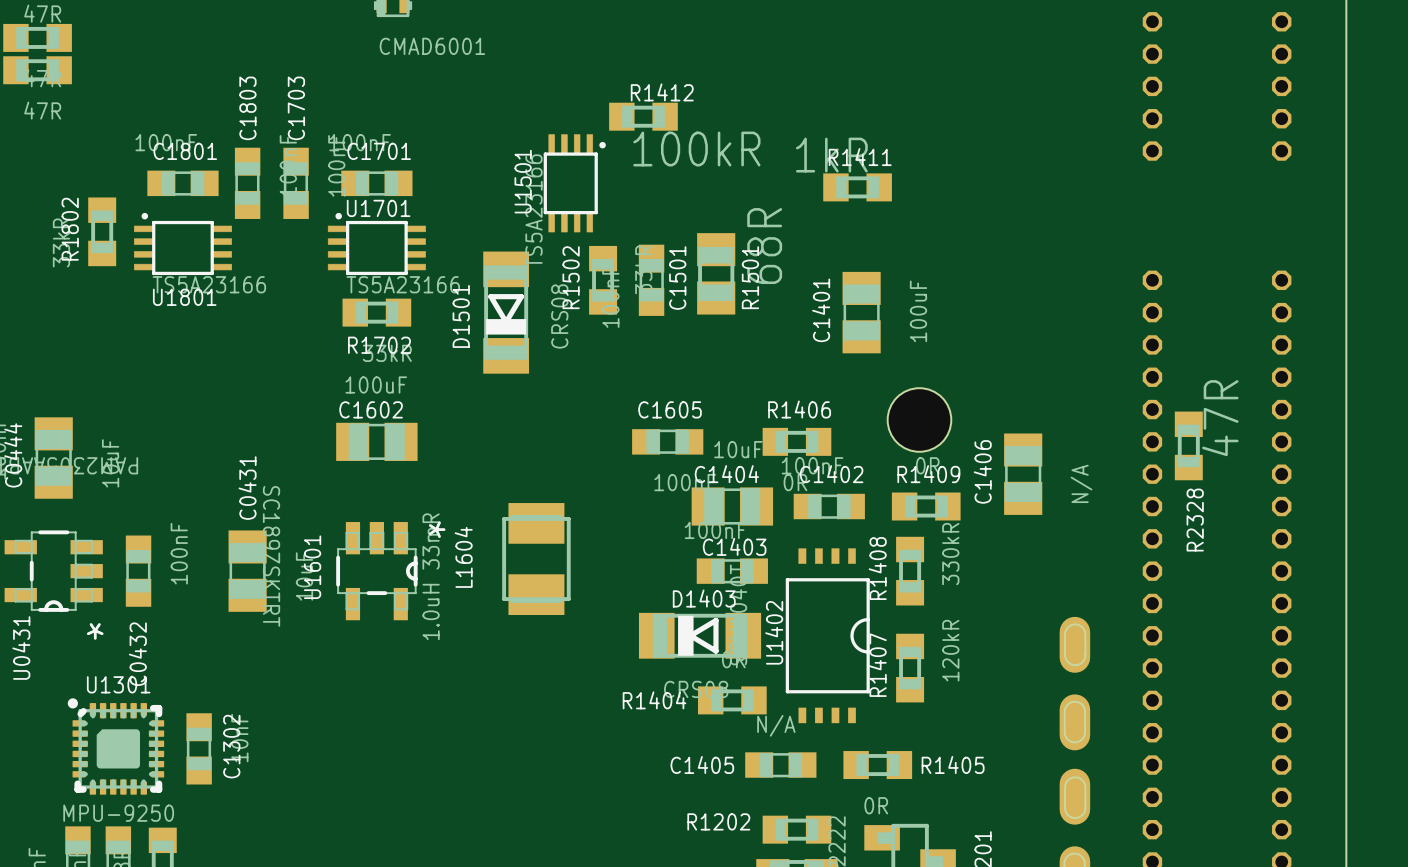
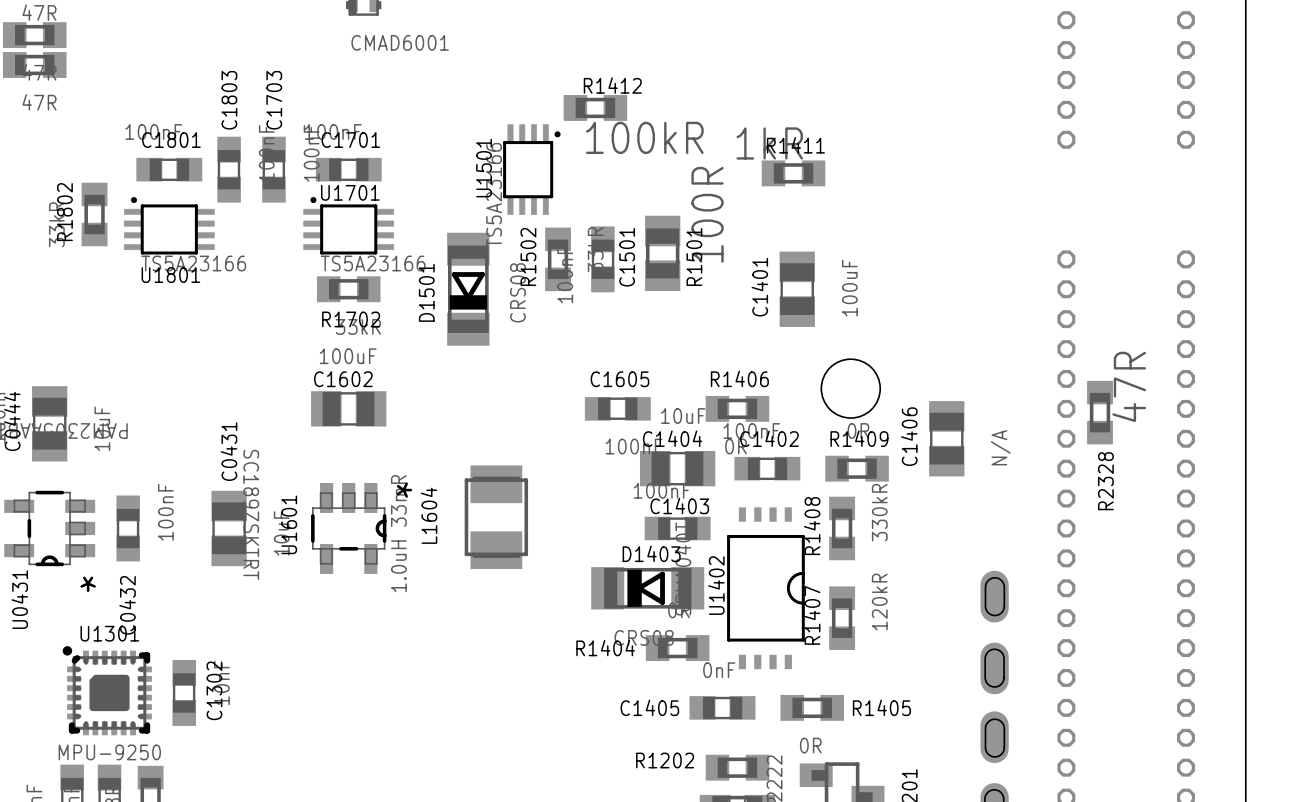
R1501 value: 68R (764, 246) -> 100R (707, 214)
C1405 value: N/A (776, 725) -> 0nF (719, 670)

